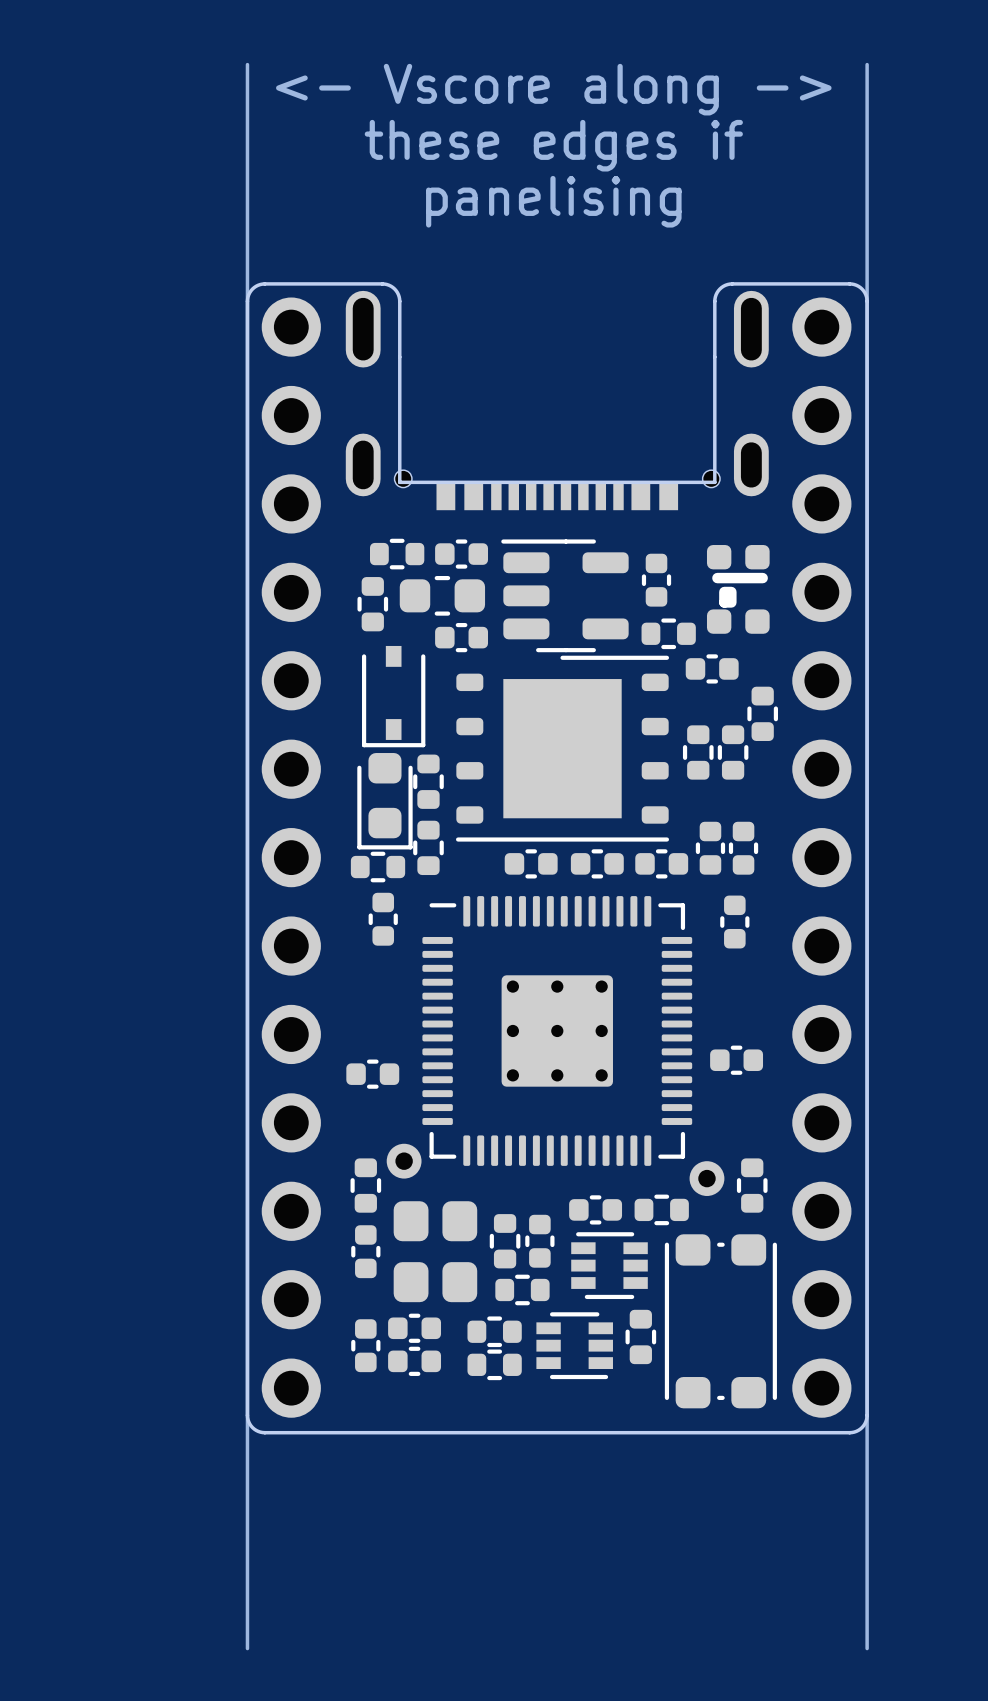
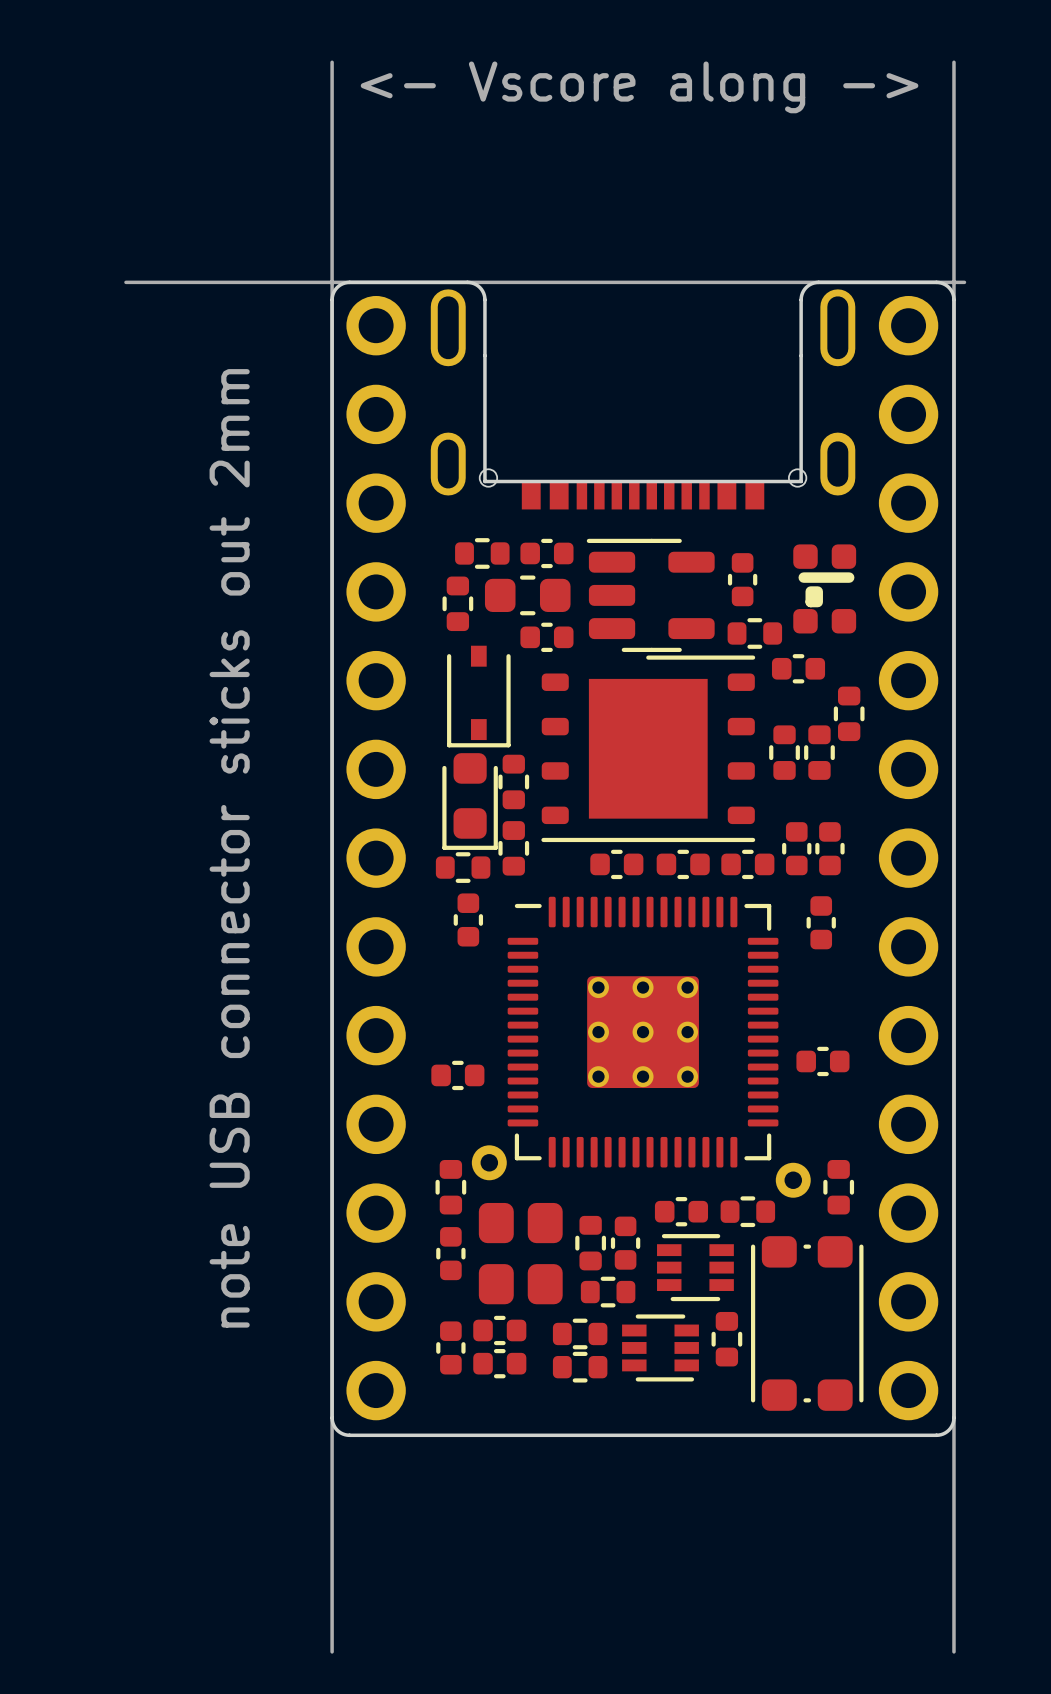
text: these edges if (553, 145) -> none
text: panelising (553, 201) -> none
line: none -> (125, 282) (964, 282)
text: none -> note USB connector sticks out 2mm (229, 848)

